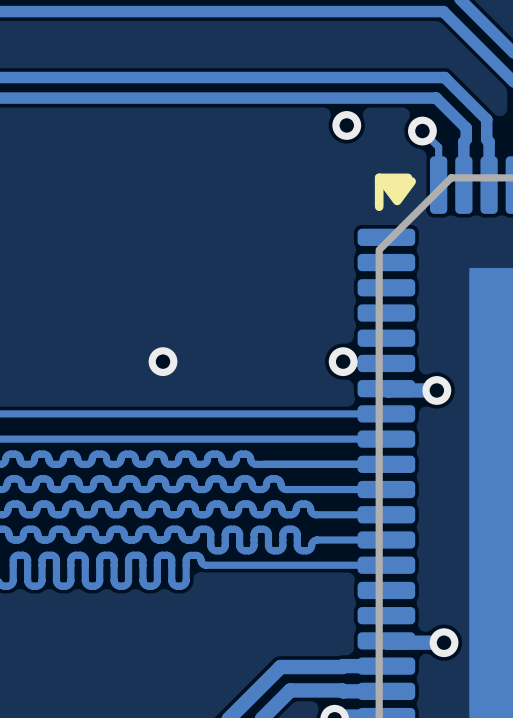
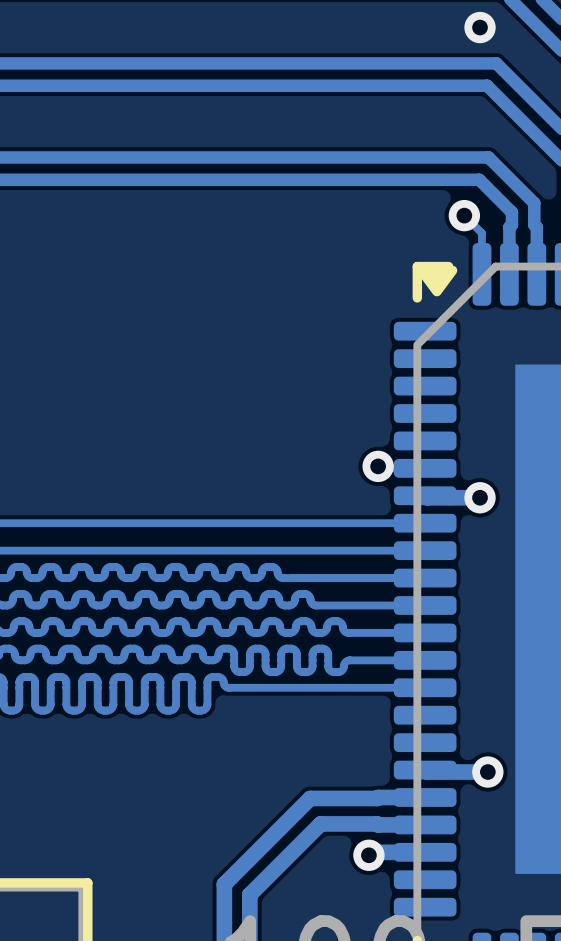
via: (346, 125) -> none
via: (163, 361) -> none

